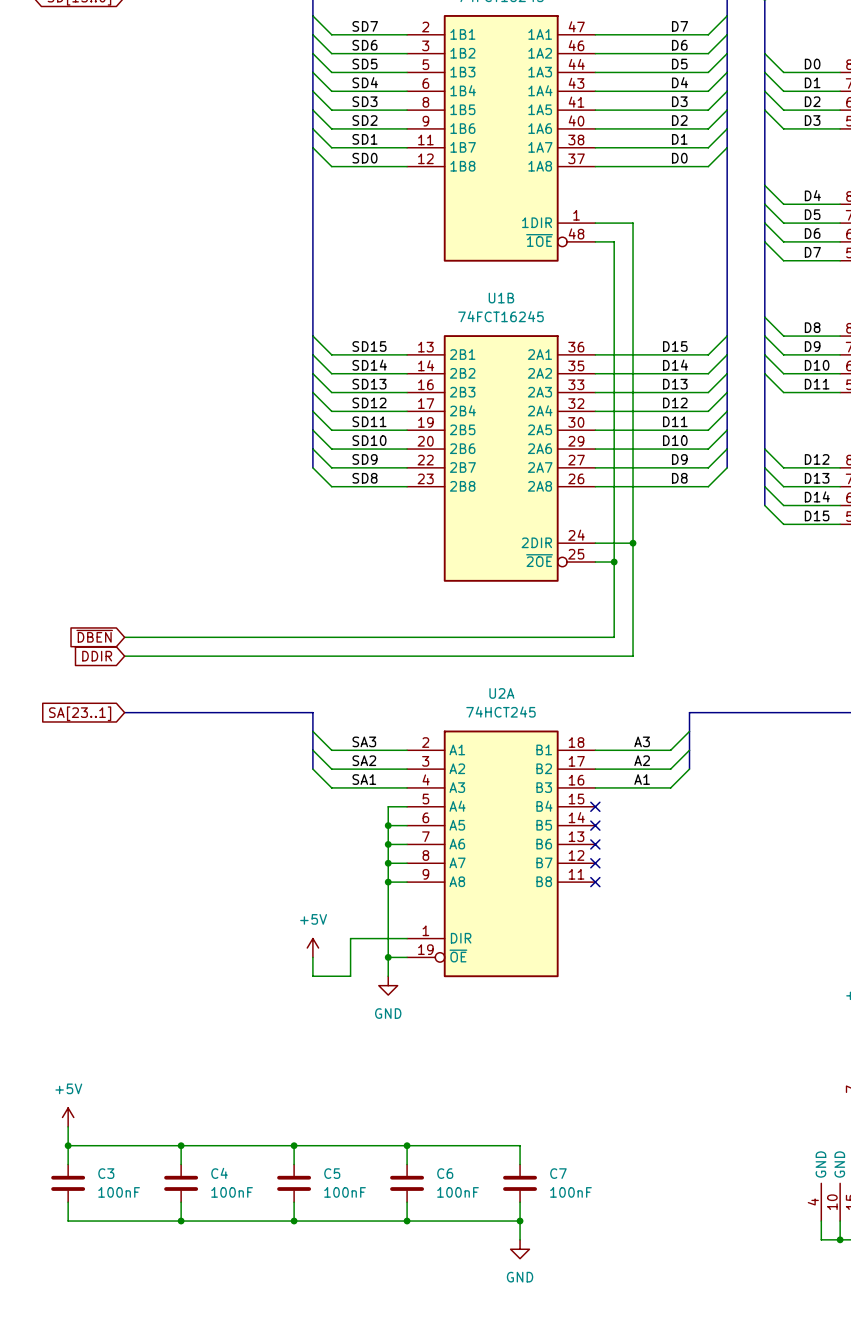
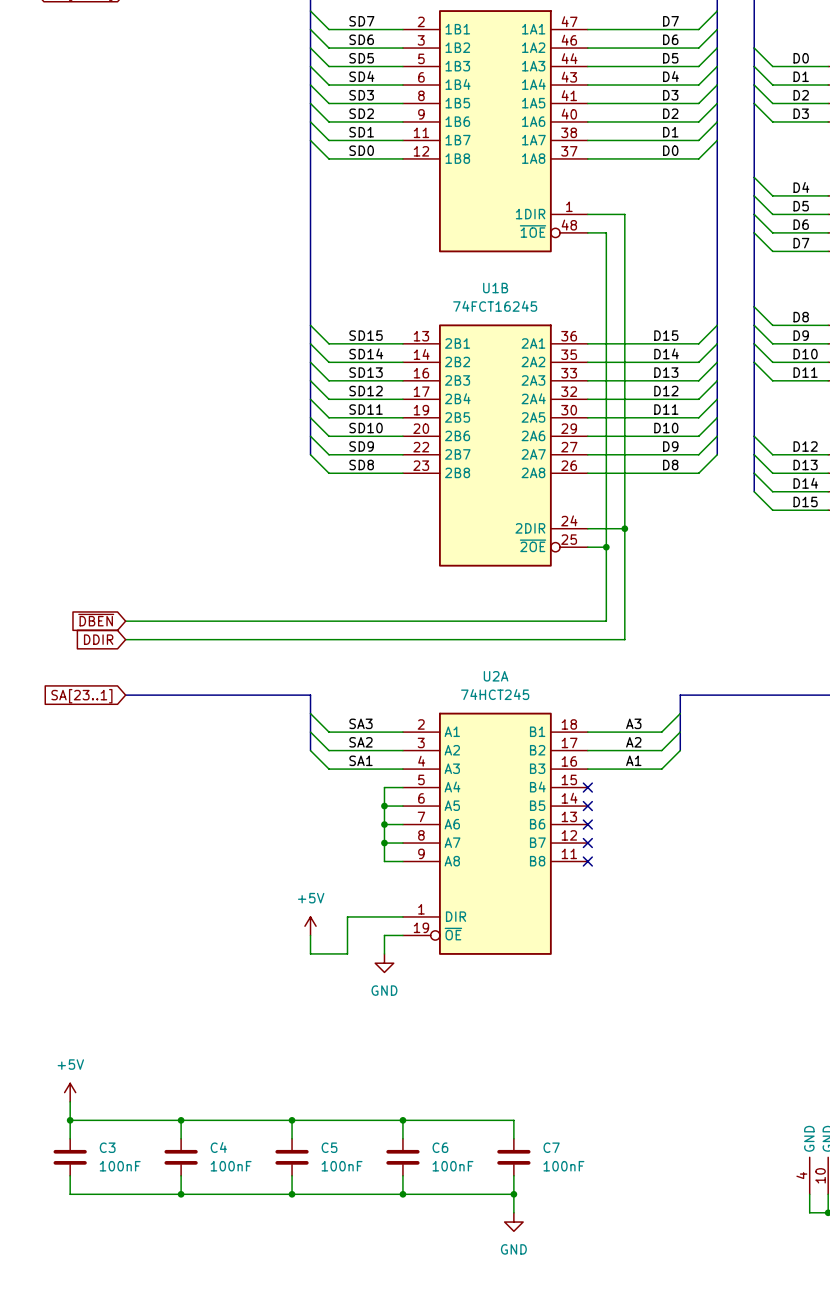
wire: (388, 882) (388, 957) -> none
junction: (388, 882) -> none
junction: (388, 957) -> none

